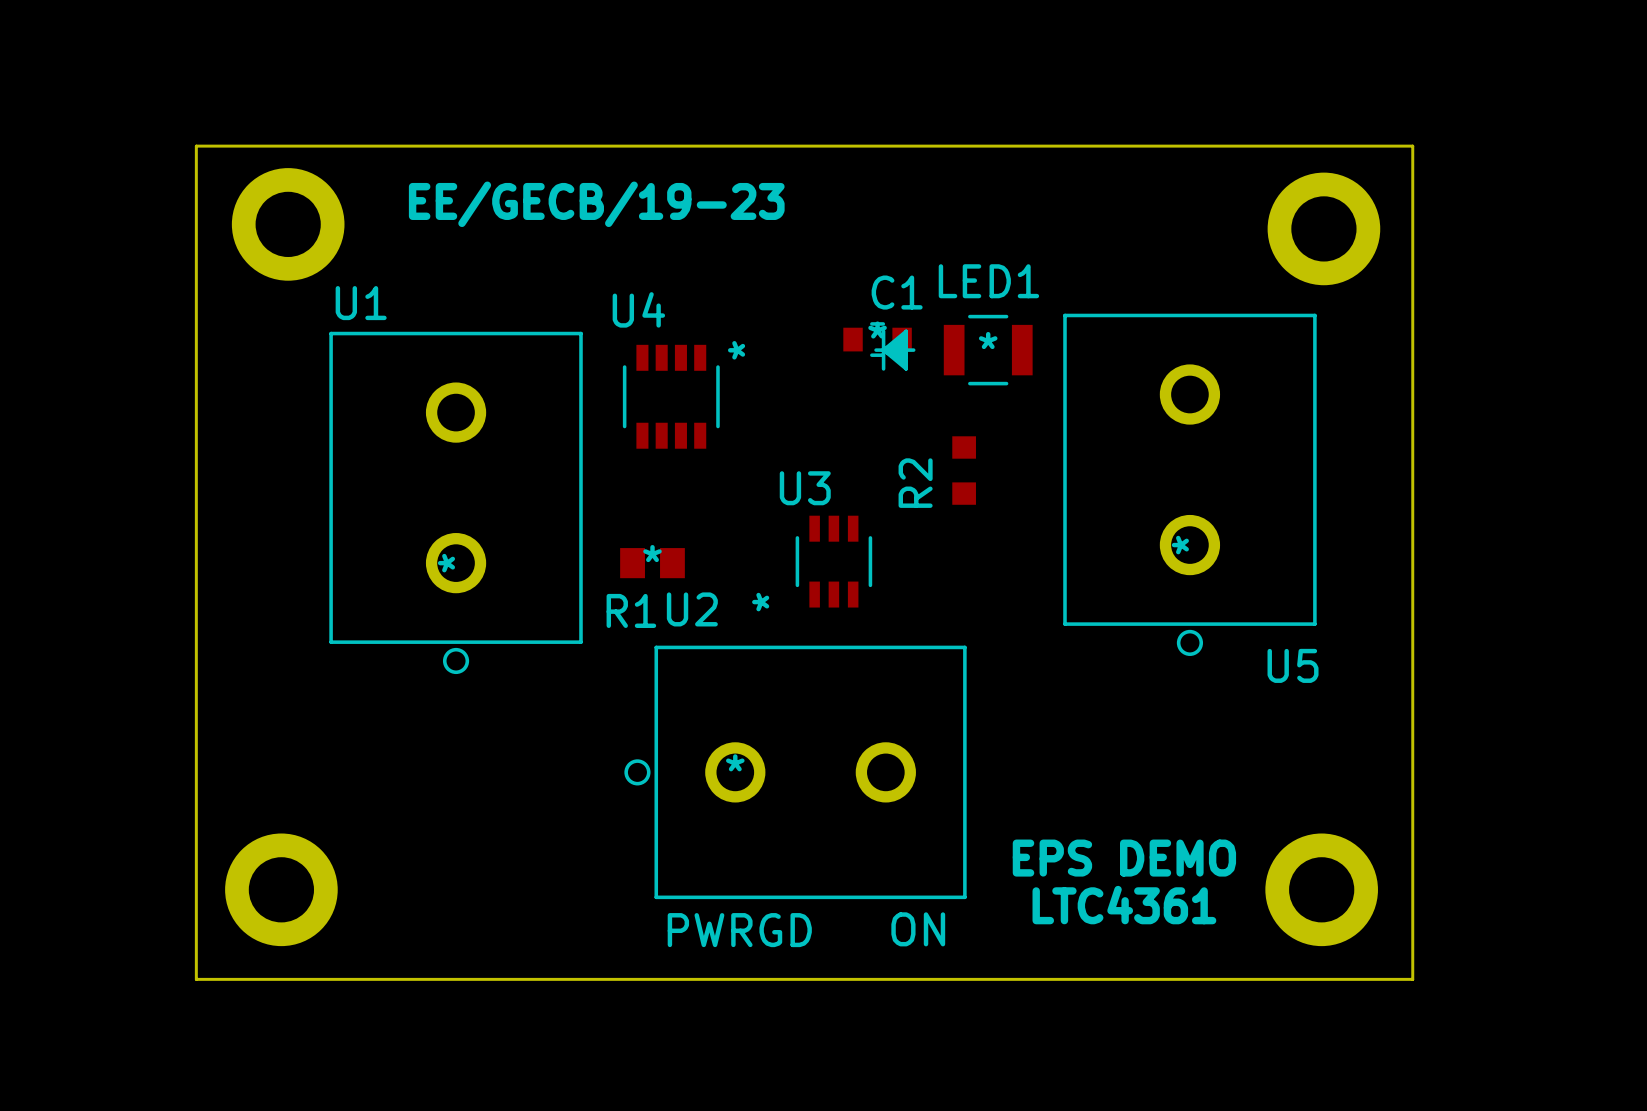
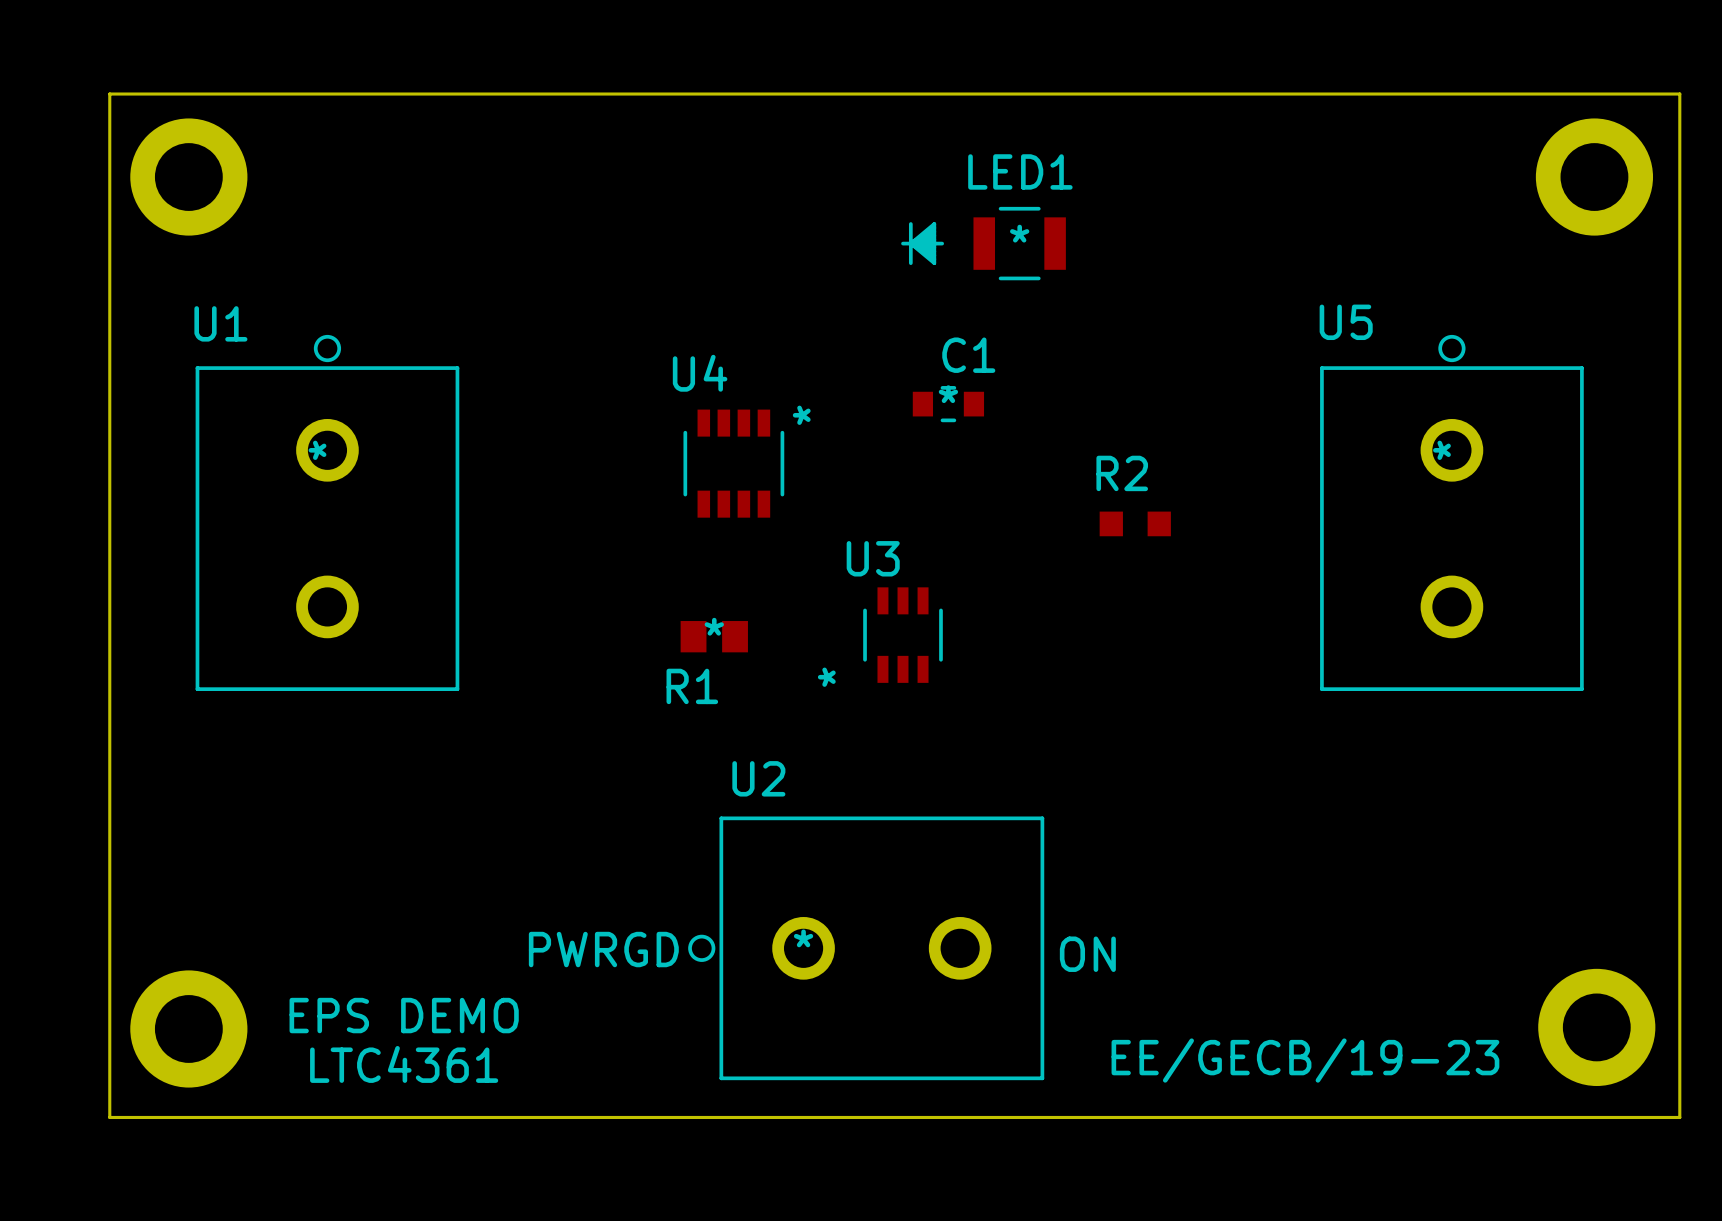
board edge: (196, 146) (1412, 146) (1412, 979) (196, 979) (196, 146) -> (109, 94) (109, 1117) (1679, 1117) (1679, 94) (109, 94)
text: EE/GECB/19-23 (596, 204) -> none
part position: (288, 224) -> (188, 177)
part position: (1323, 228) -> (1594, 177)
LED1 position: (953, 350) -> (983, 243)
R2 rotation: 0° (964, 470) -> 90° clockwise (1135, 523)
R2 position: (964, 470) -> (1135, 523)
U5 rotation: 0° (1189, 484) -> 180° (1451, 512)
U1 rotation: 0° (456, 502) -> 180° (327, 512)
U2 position: (795, 772) -> (866, 948)
text: EPS DEMO (1124, 858) -> none
part position: (281, 889) -> (188, 1028)
part position: (1321, 889) -> (1596, 1027)
text: LTC4361 (1124, 905) -> none
text: none -> EPS DEMO (404, 1015)
text position: ON (918, 929) -> ON (1087, 954)
text position: PWRGD (739, 930) -> PWRGD (603, 949)
text: none -> EE/GECB/19-23 (1305, 1060)
text: none -> LTC4361 (404, 1064)

